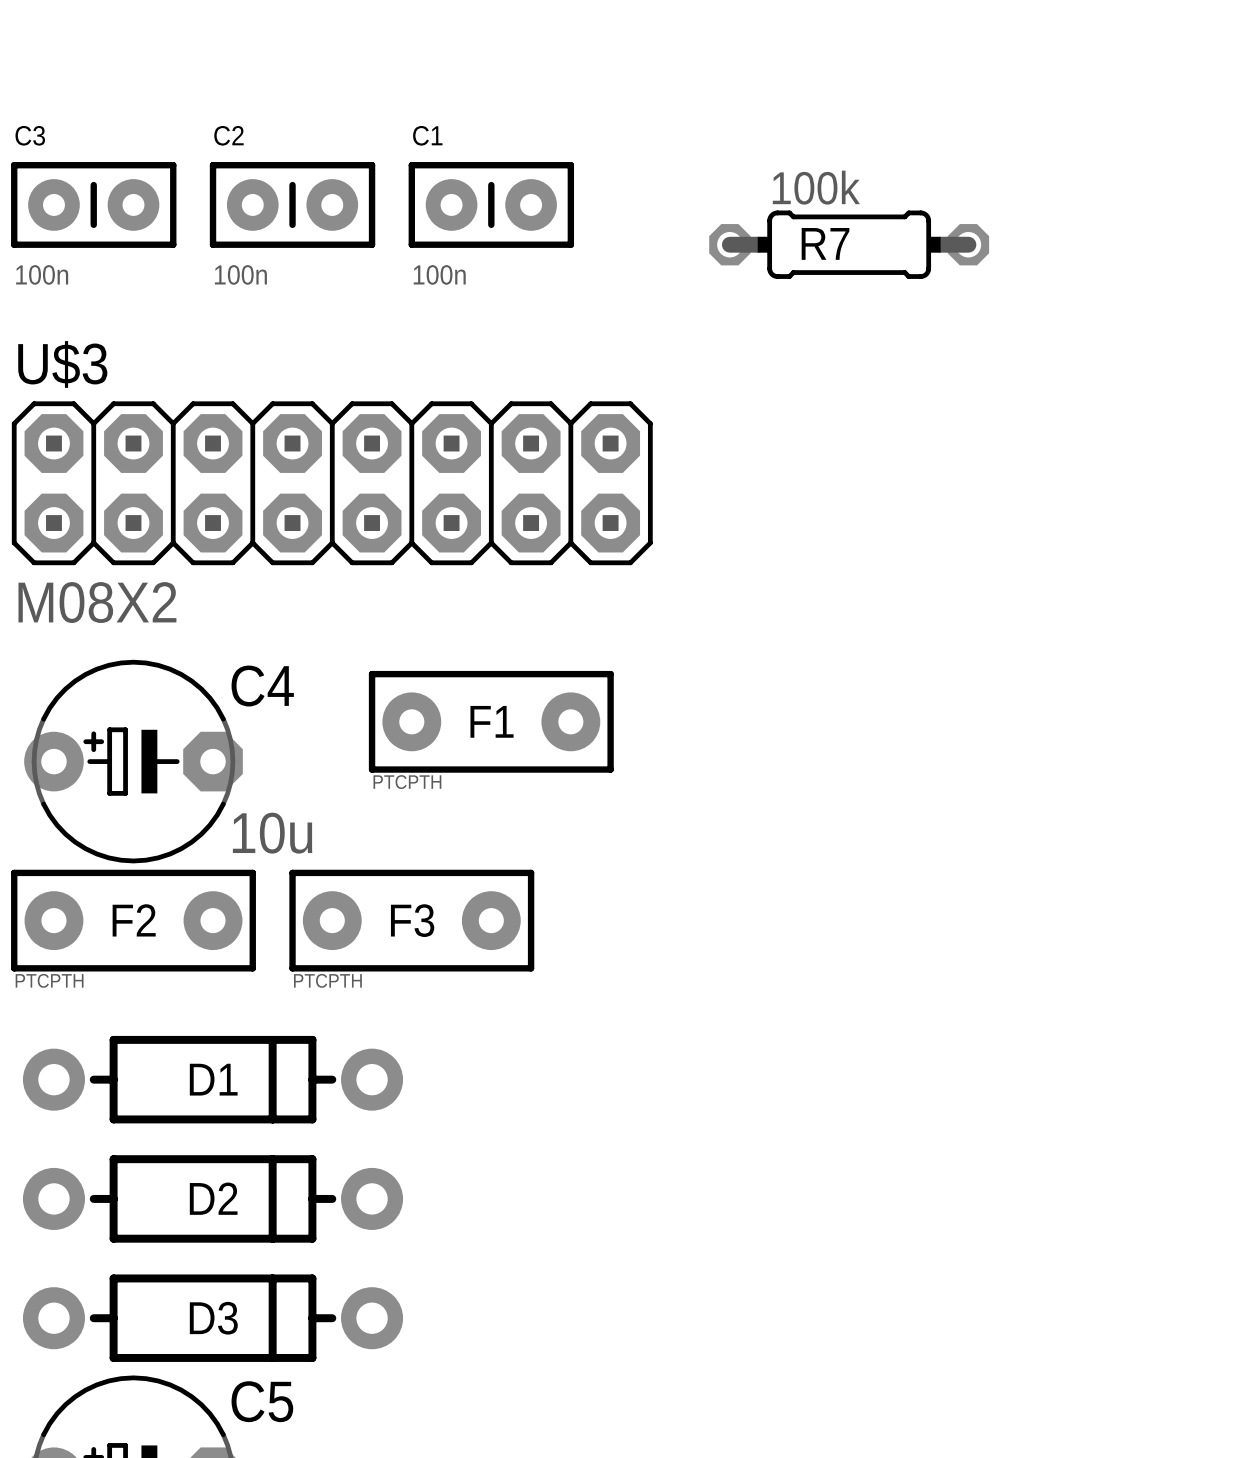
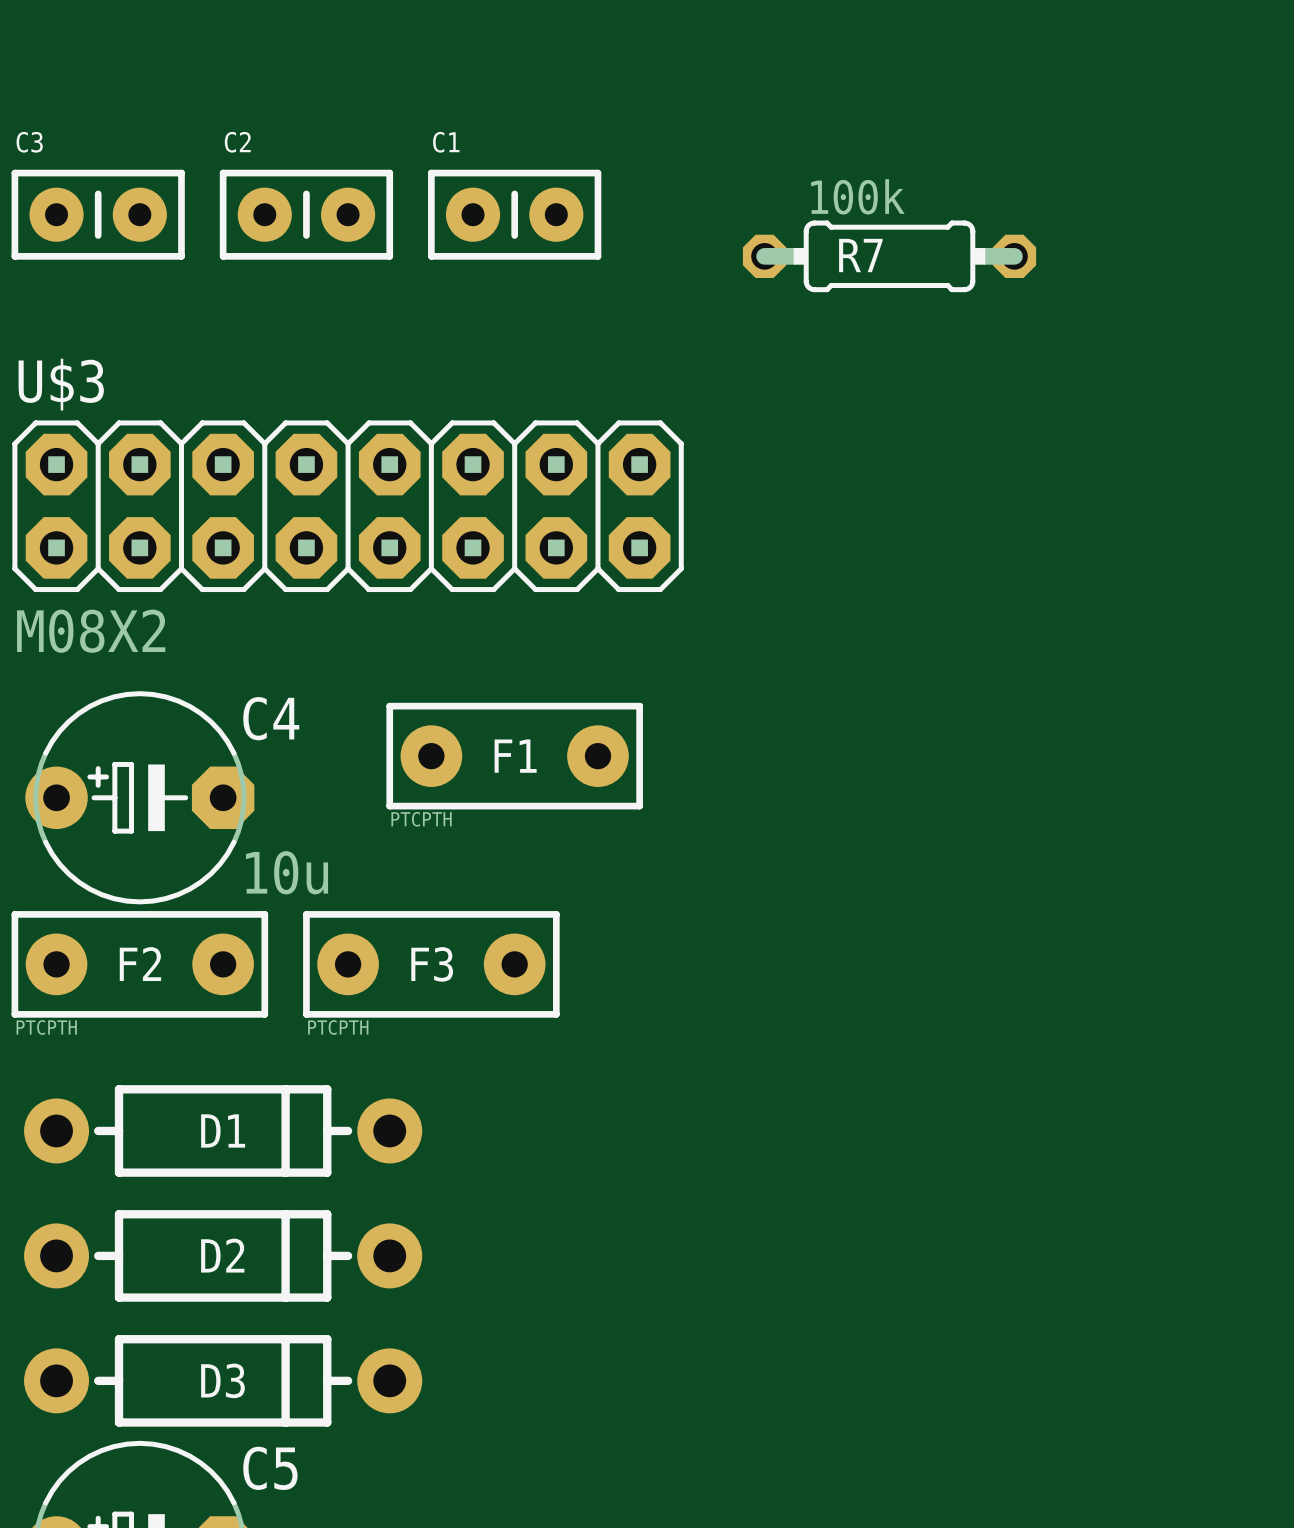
C3 value: 100n (42, 274) -> none
C2 value: 100n (240, 274) -> none
C1 value: 100n (439, 274) -> none

